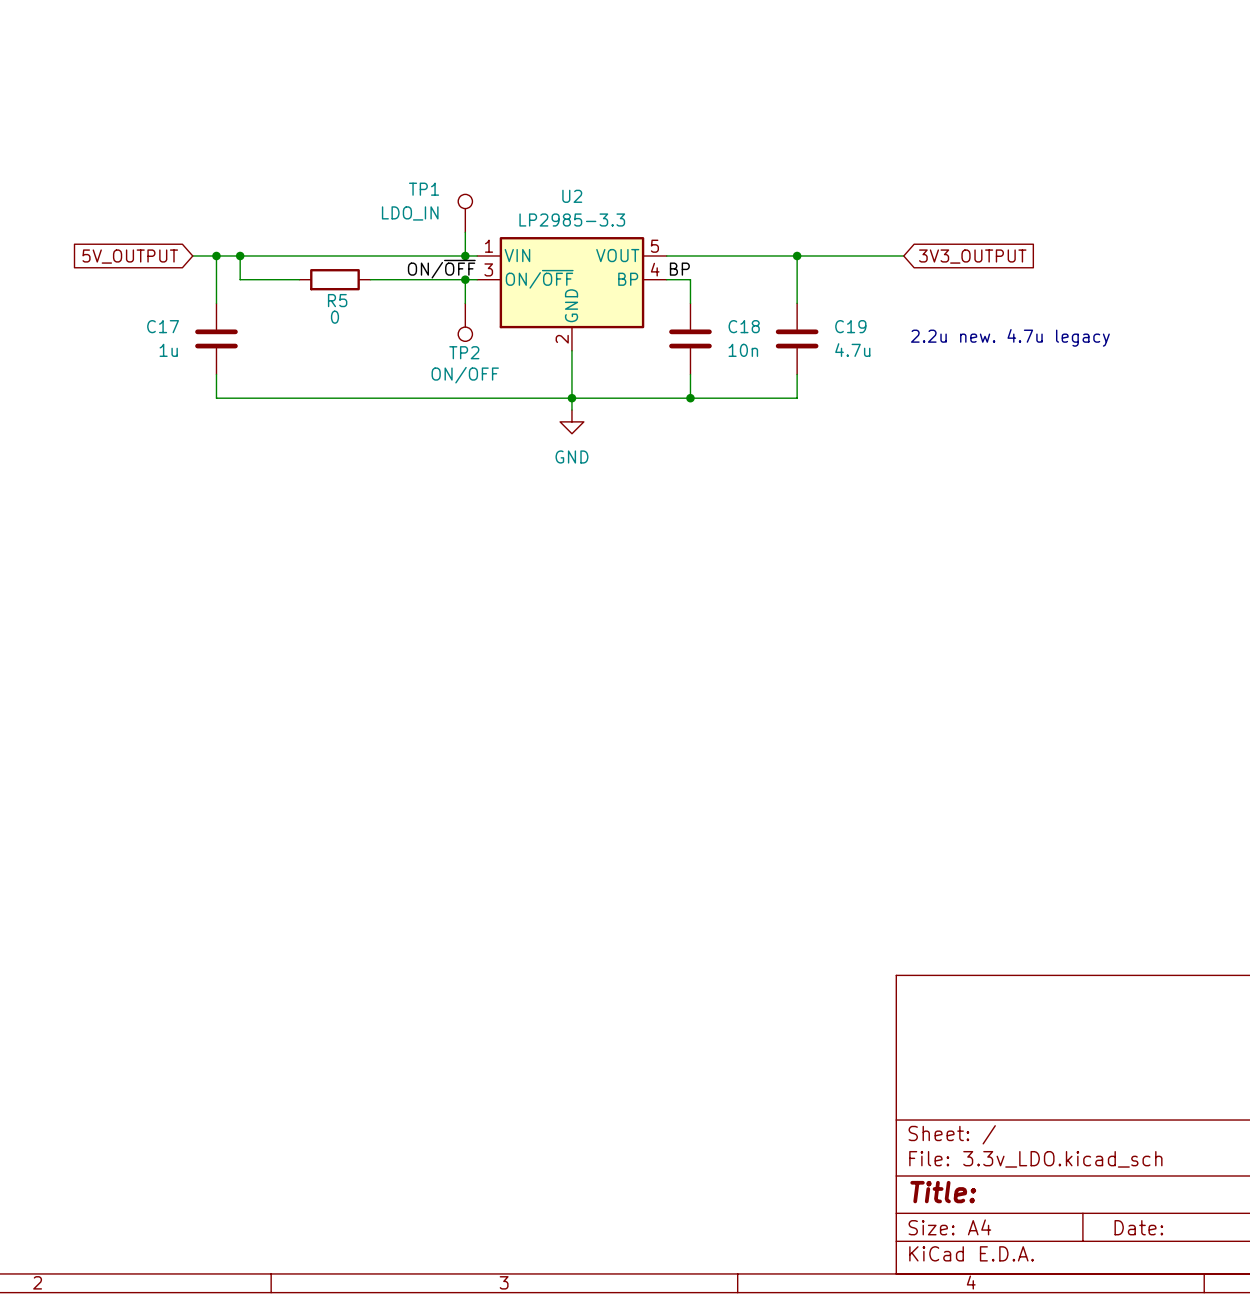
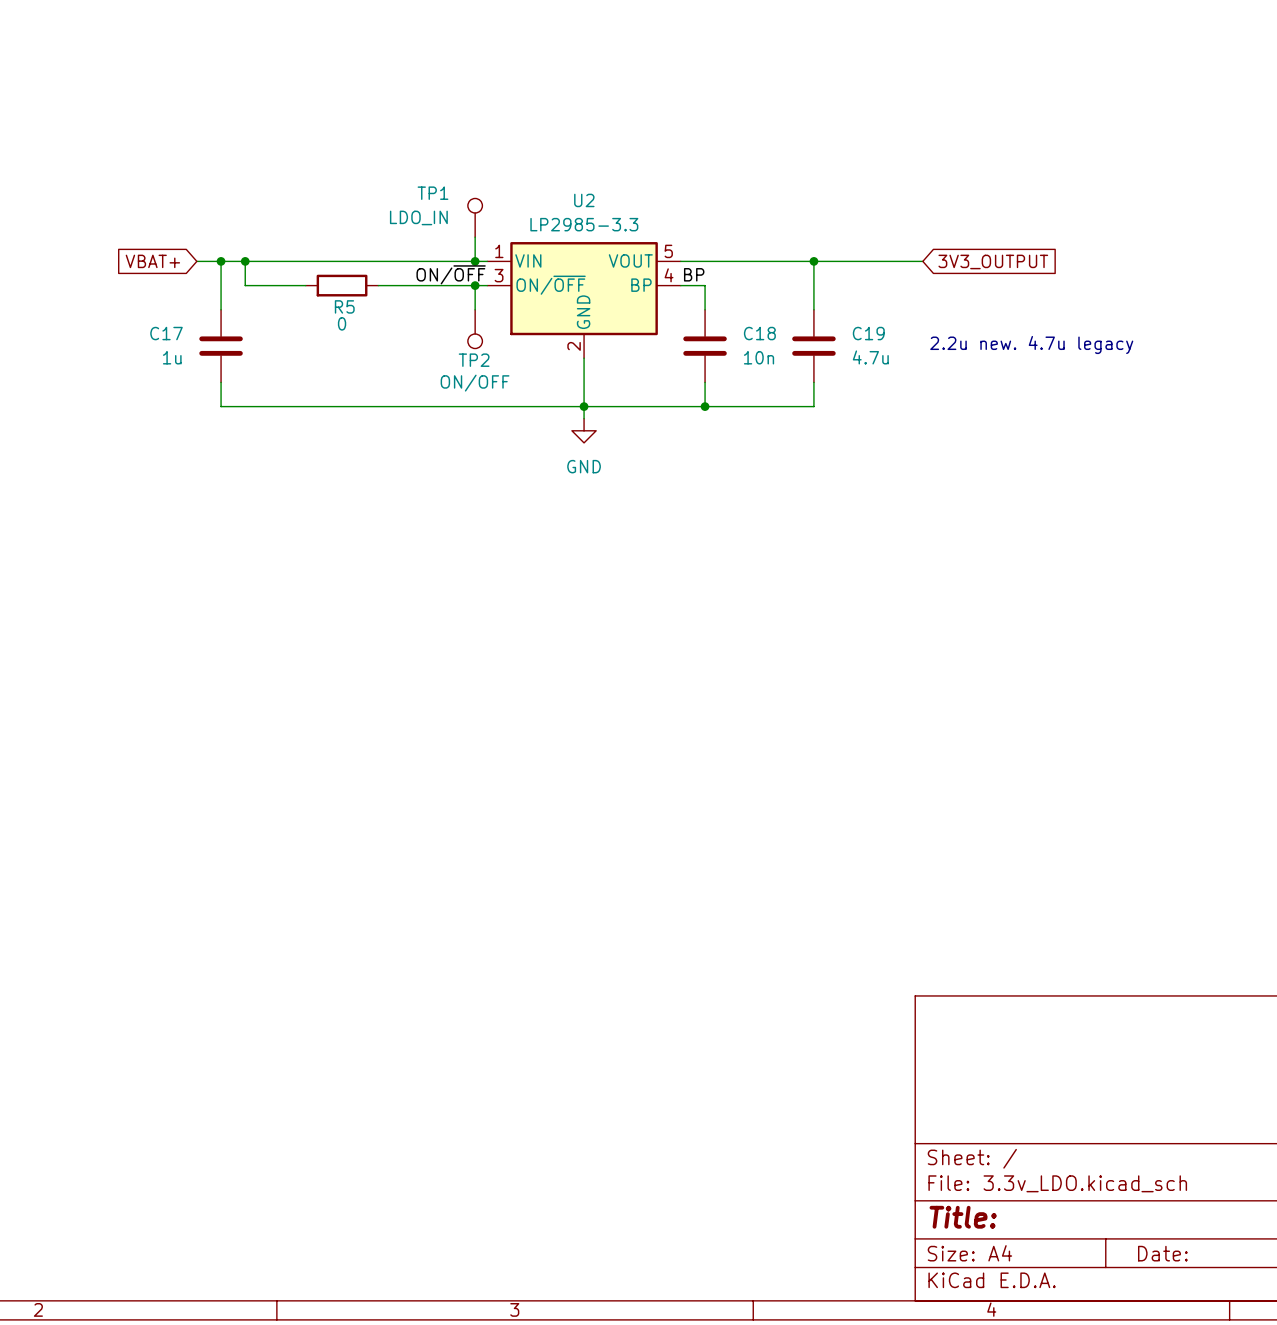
global label: 5V_OUTPUT (130, 256) -> VBAT+ (152, 261)

